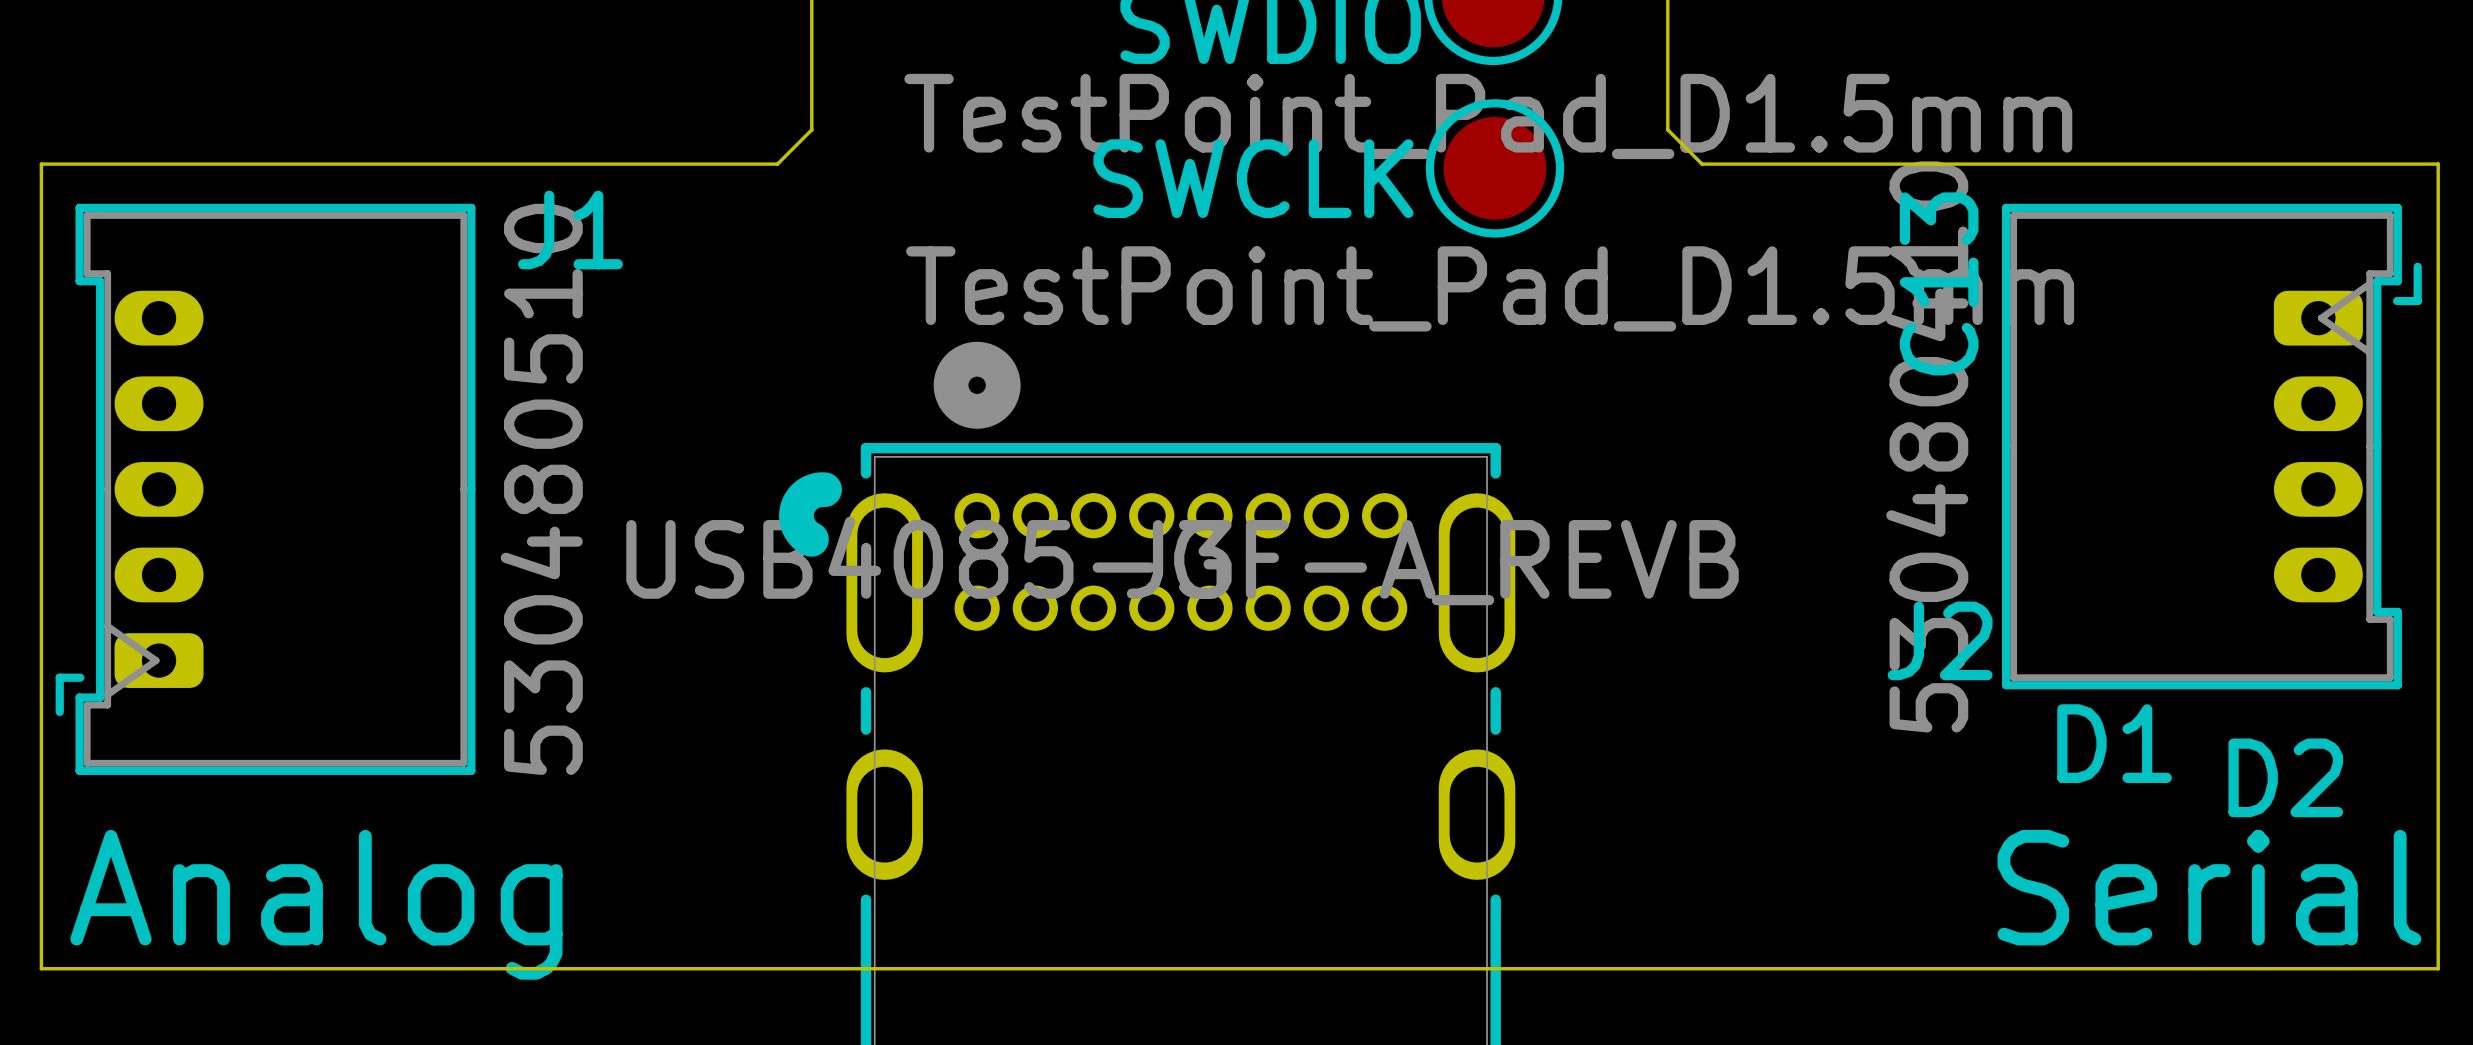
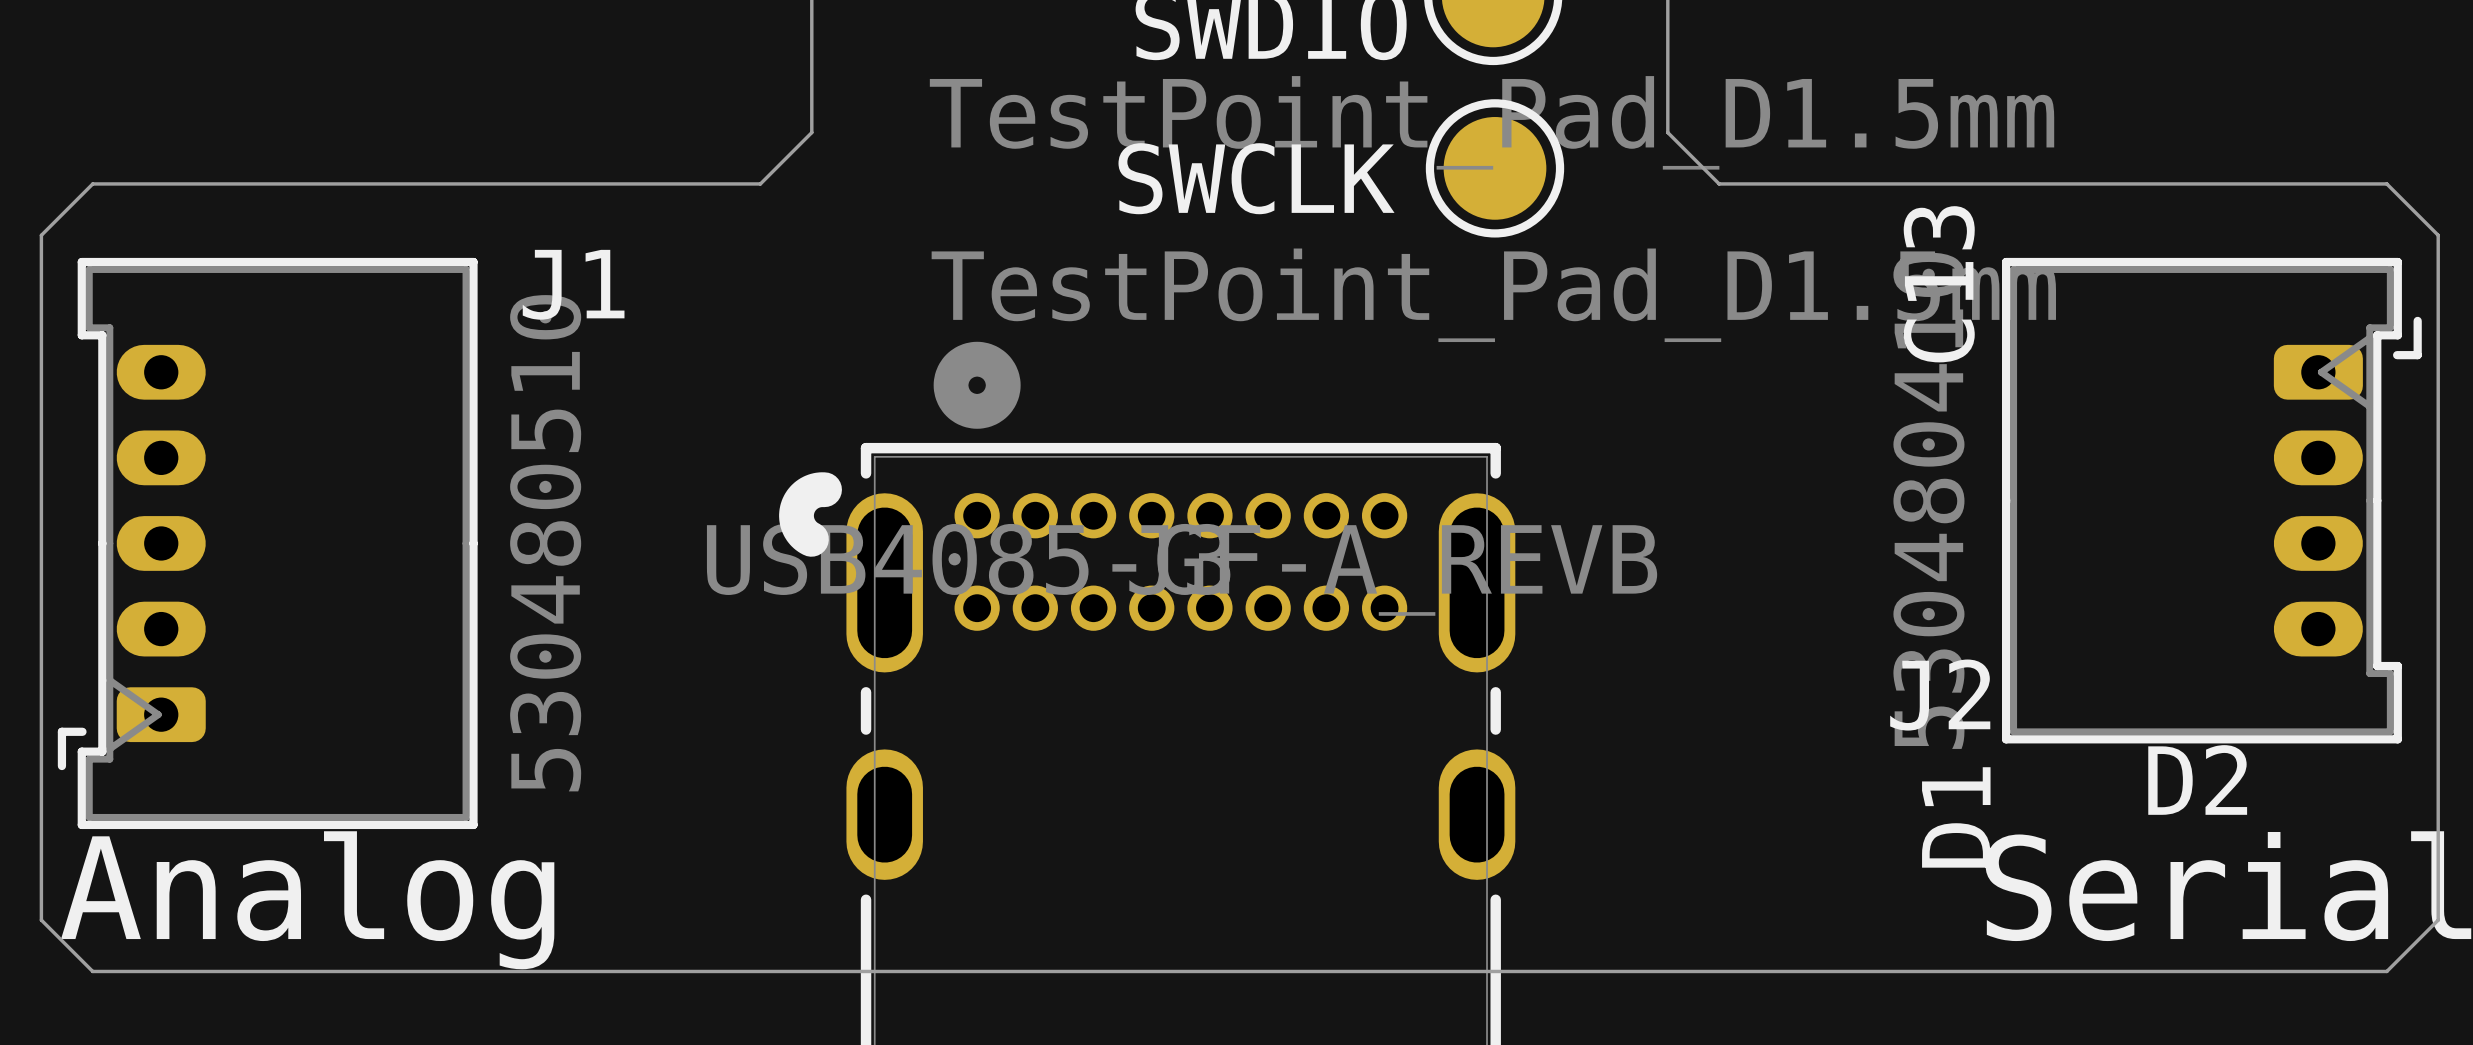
board edge: (811, 129) (777, 164) (41, 164) (41, 235) -> (811, 129) (811, 132) (760, 183) (92, 183) (41, 235)
board edge: (1667, 129) (1702, 164) (2438, 164) (2438, 235) -> (1667, 129) (1667, 132) (1719, 183) (2386, 183) (2438, 235)
J2 position: (2211, 446) -> (2211, 500)
J1 position: (265, 489) -> (267, 543)
D1 position: (2114, 743) -> (1956, 817)
D1 name rotation: 0° (2114, 743) -> 90° counterclockwise (1956, 817)
D2 position: (2285, 777) -> (2197, 779)
board edge: (41, 920) (41, 968) (2438, 968) (2438, 920) -> (41, 920) (92, 971) (2386, 971) (2438, 920)

